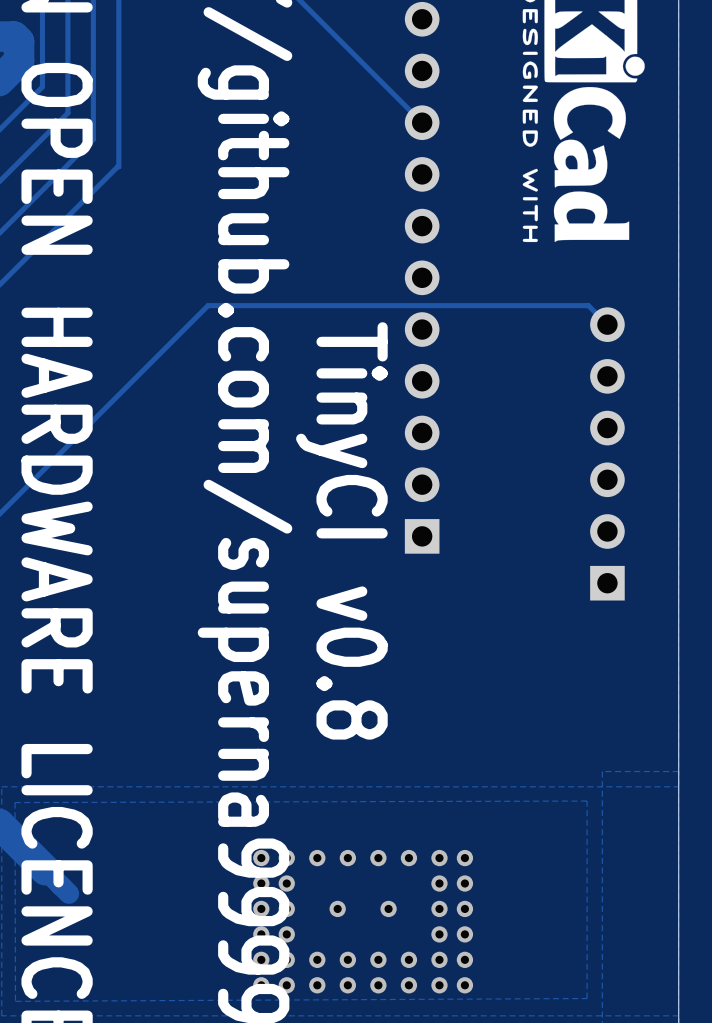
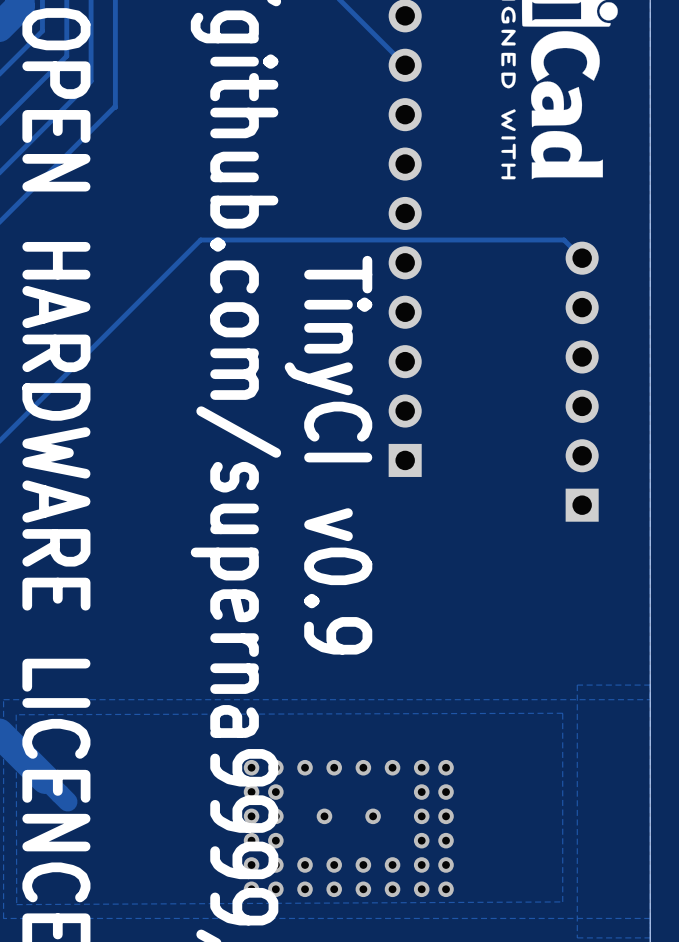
text: TinyCI v0.8 (341, 530) -> TinyCI v0.9 (328, 455)

